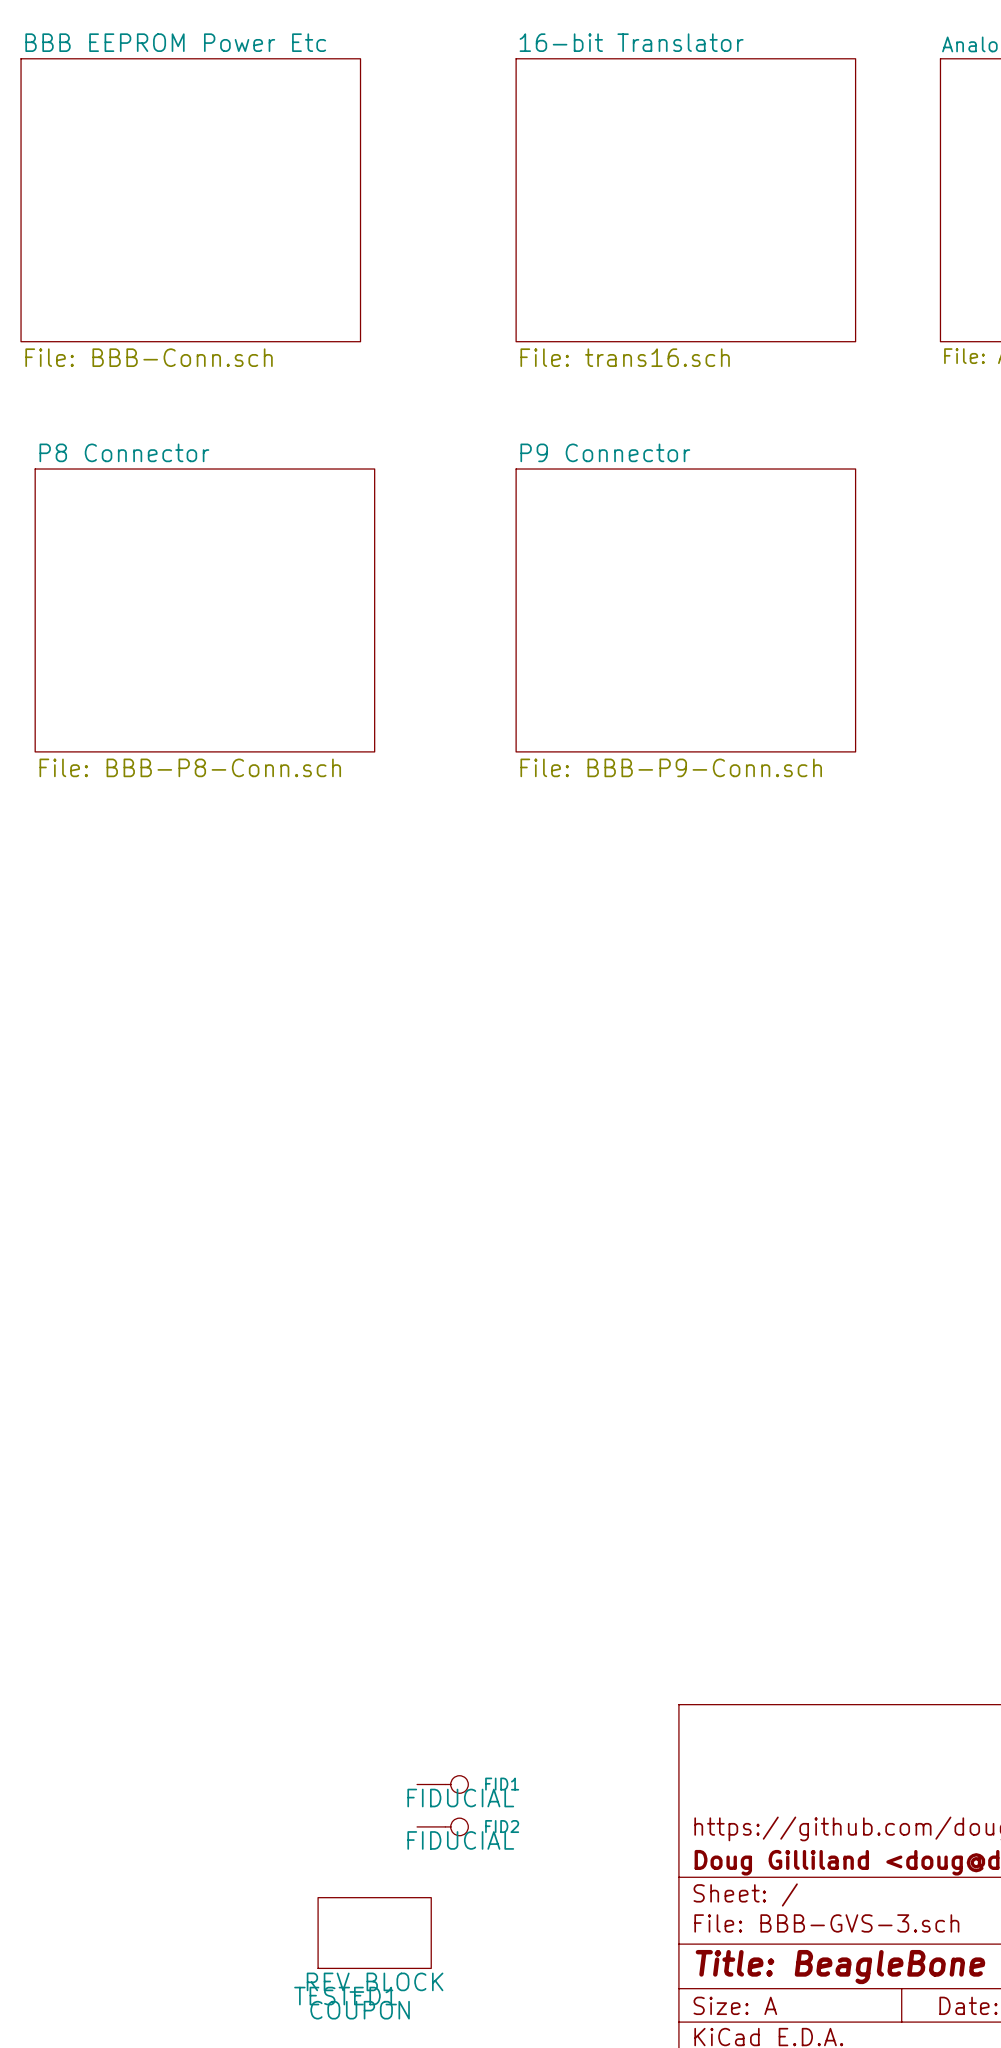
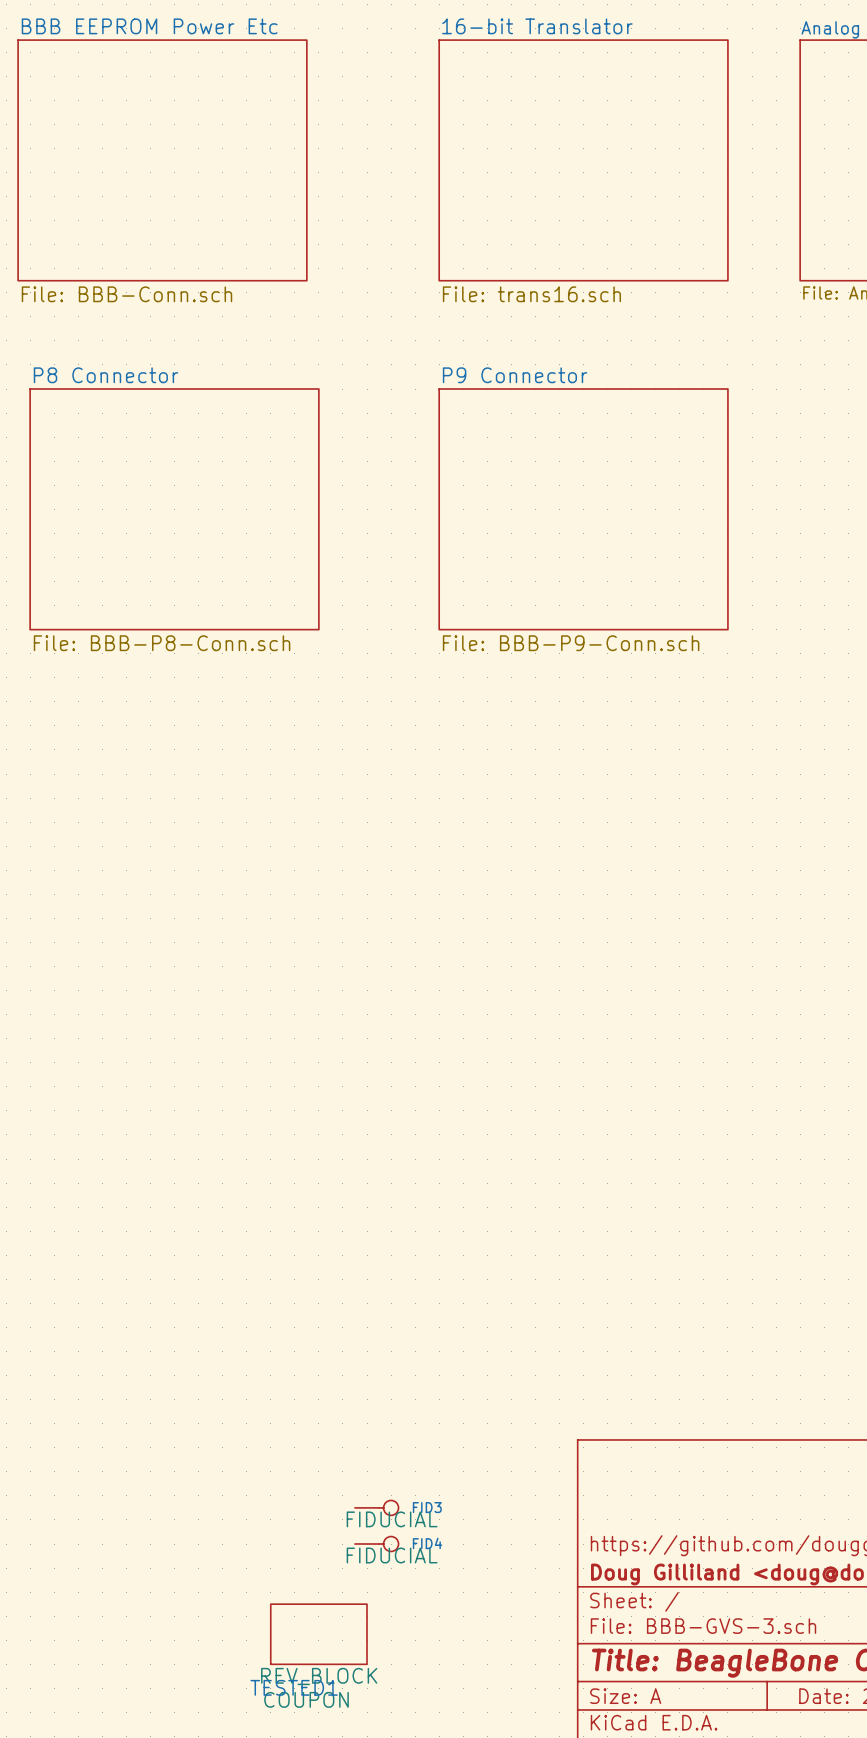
FID1 name: FID1 (502, 1784) -> FID3 (427, 1507)
FID2 name: FID2 (502, 1826) -> FID4 (427, 1543)

